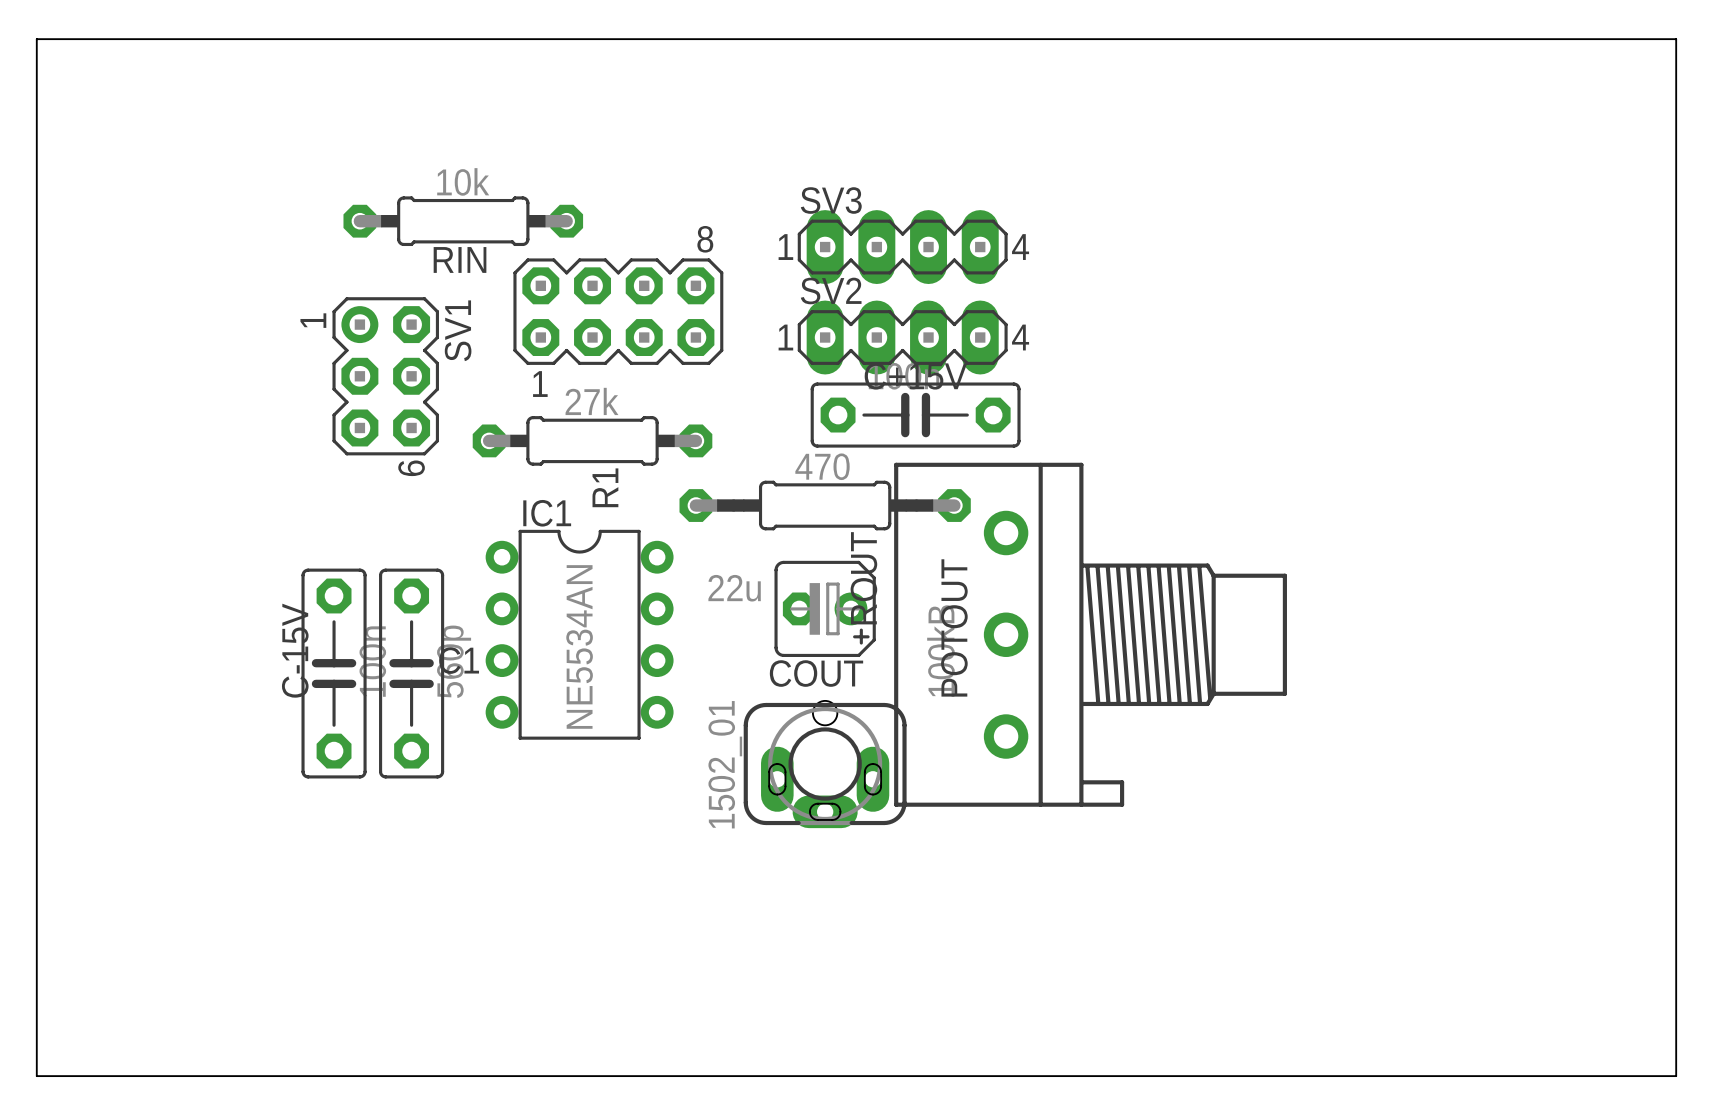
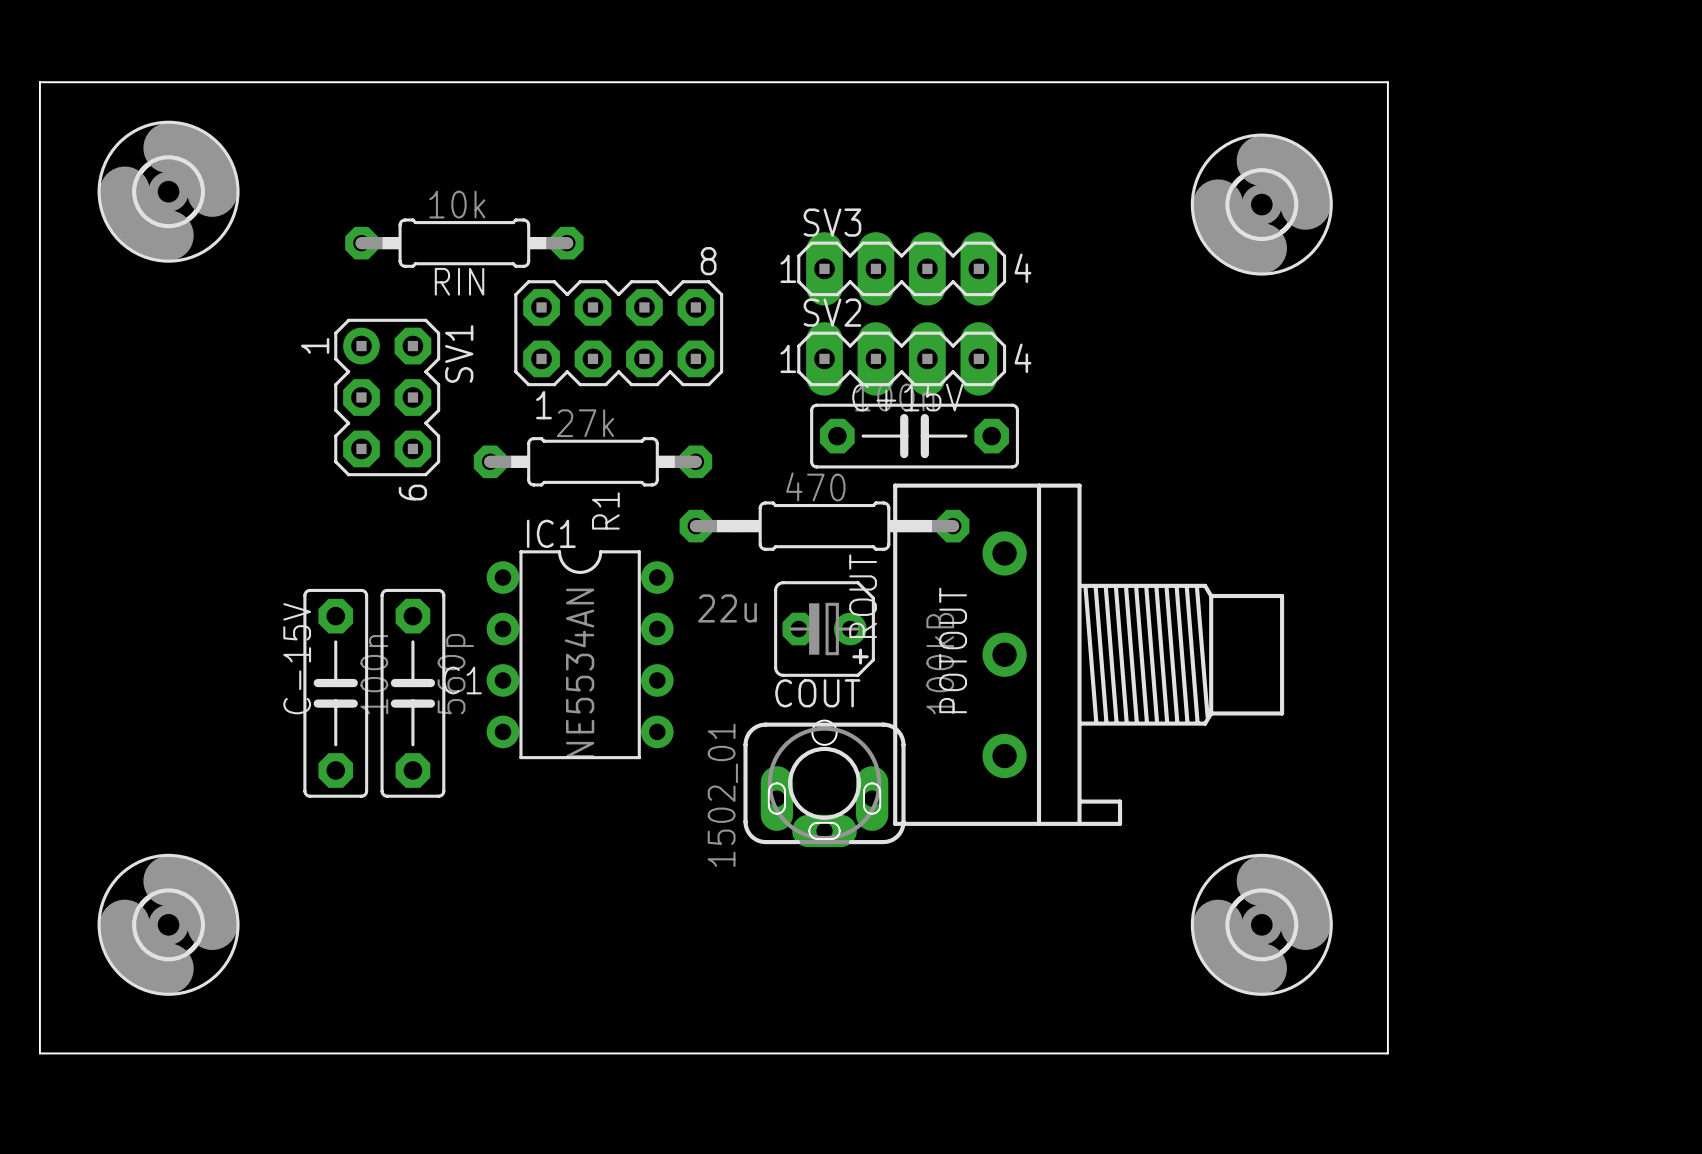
board edge: (36, 59) (36, 39) (1676, 39) (1676, 1076) (36, 1076) (36, 1035) -> (39, 82) (1387, 82) (1387, 1053) (39, 1053)
part: none -> (168, 191)
part: none -> (1261, 204)
part: none -> (168, 924)
part: none -> (1261, 924)

